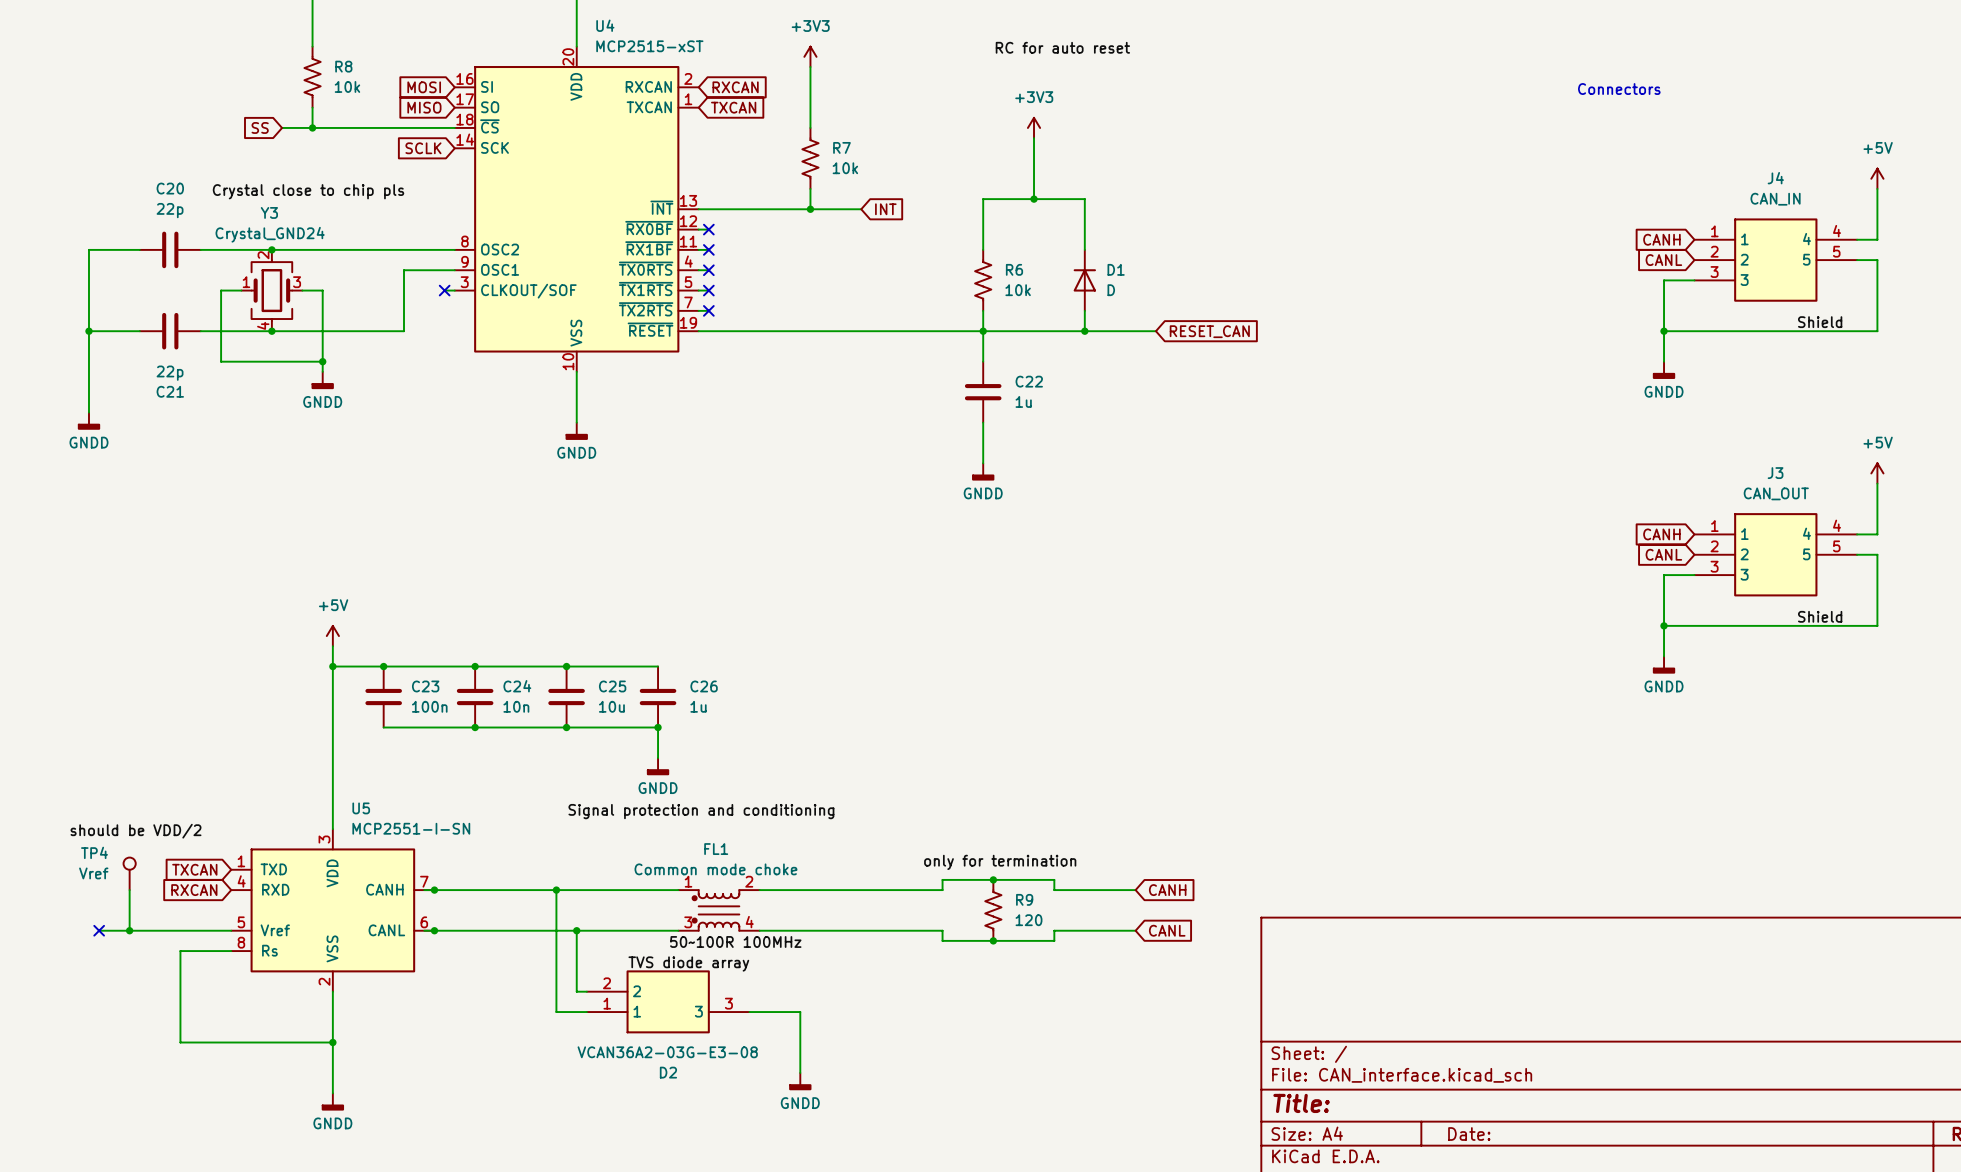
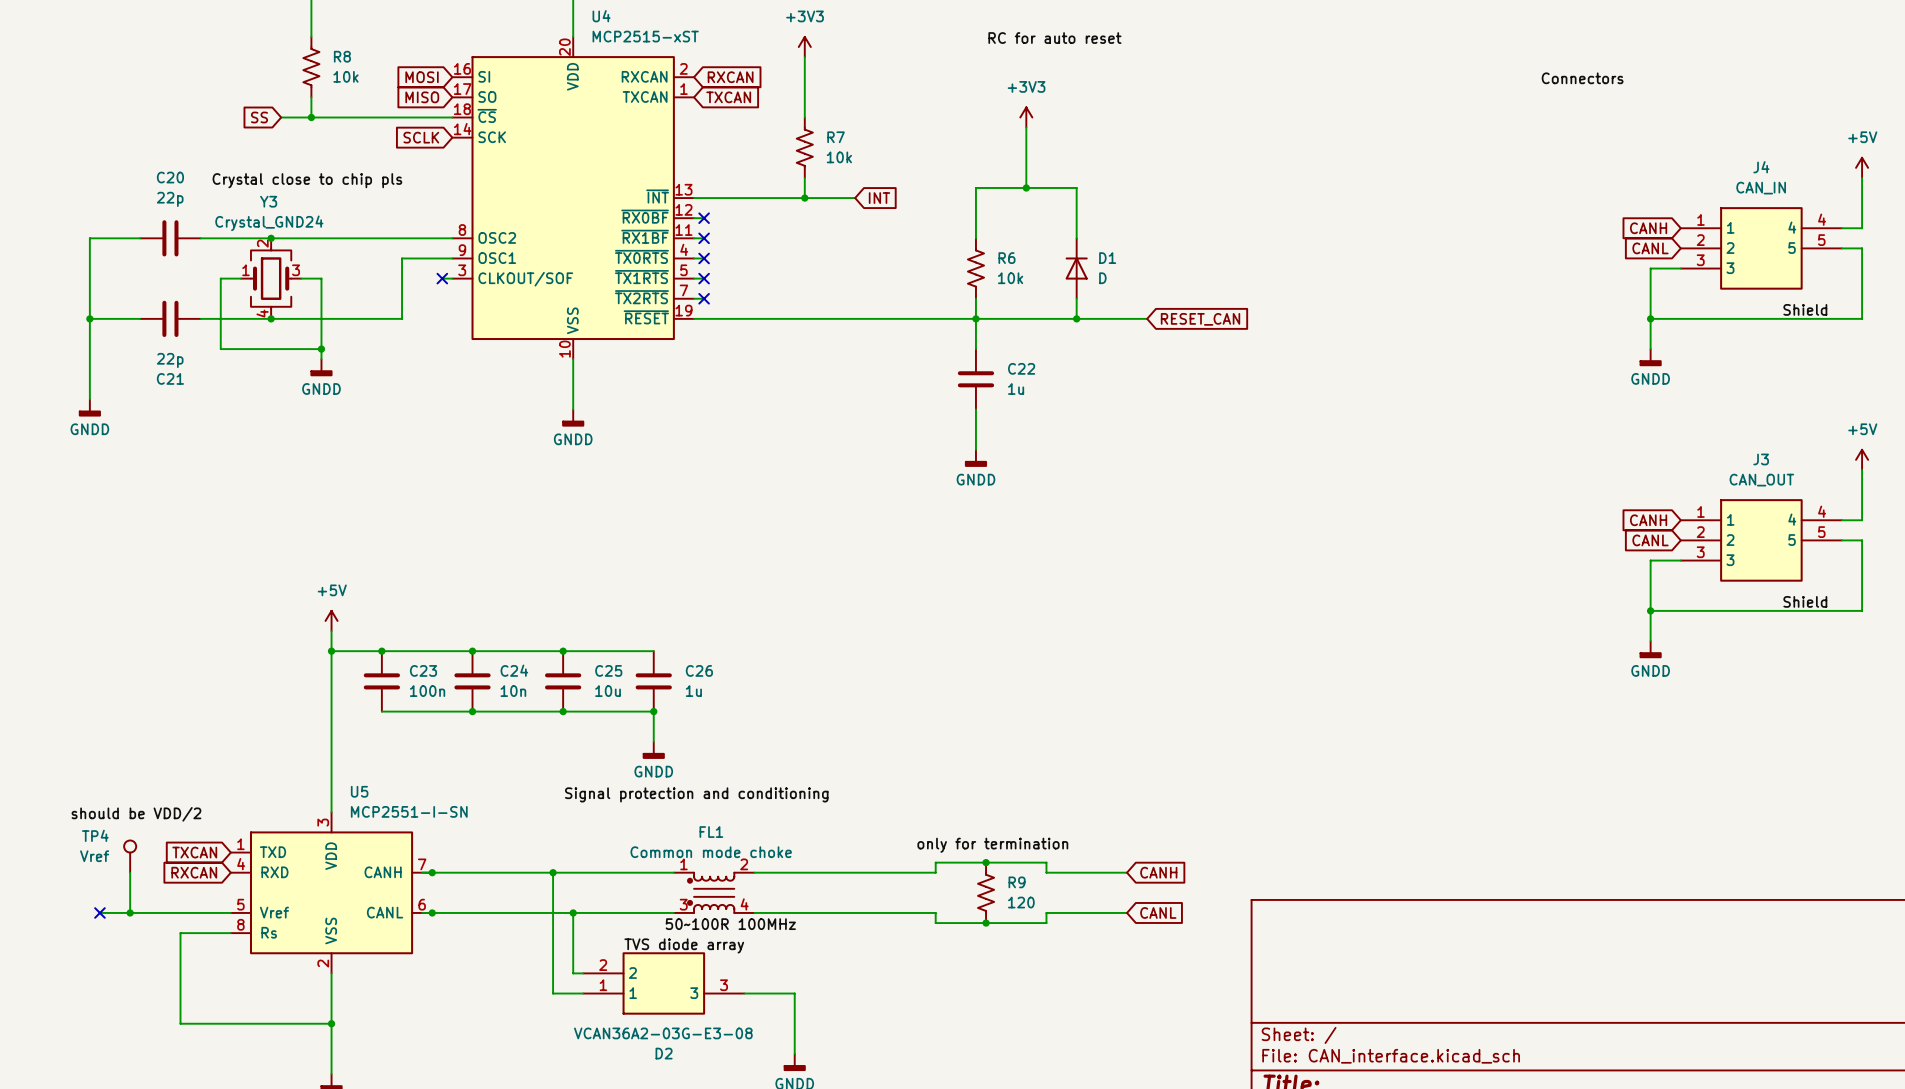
label: none -> Connectors (1582, 78)
text: Connectors (1619, 89) -> none

